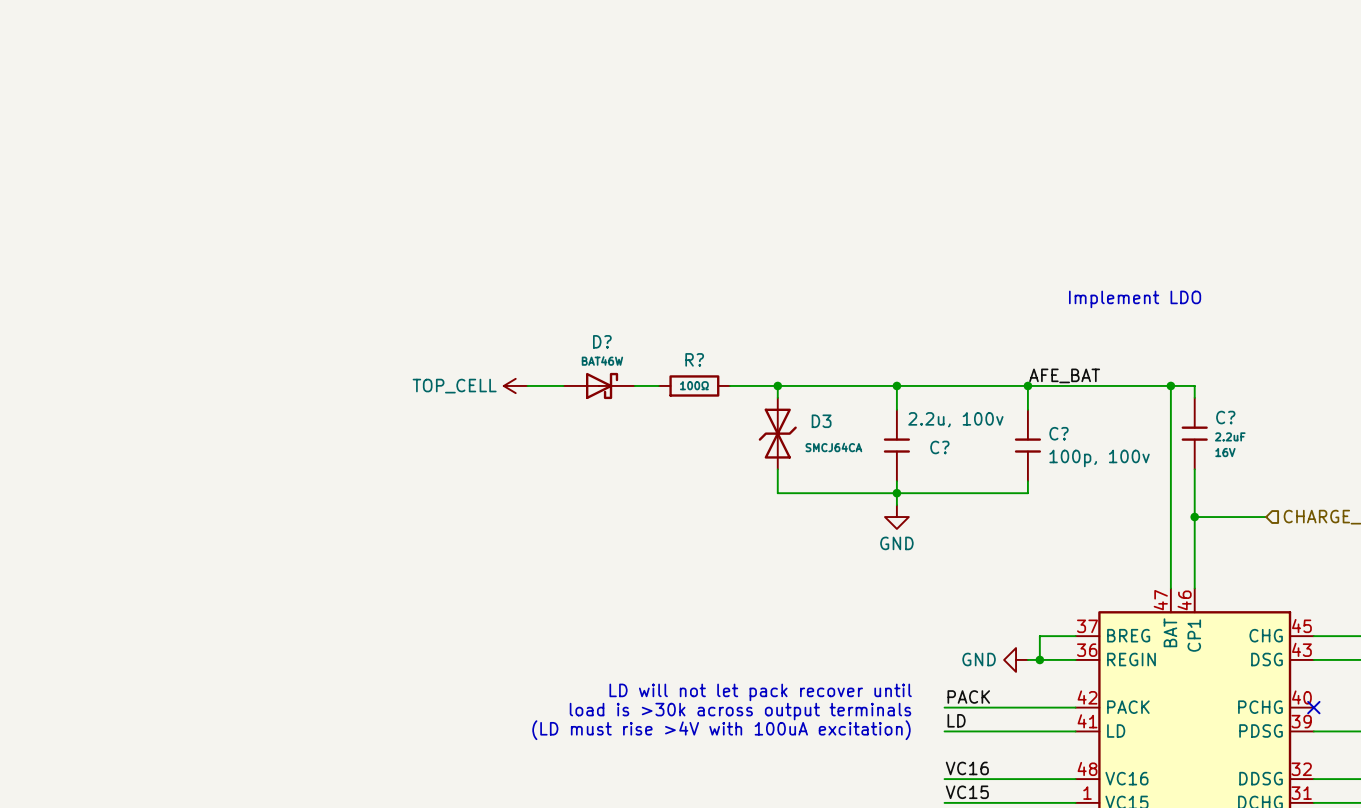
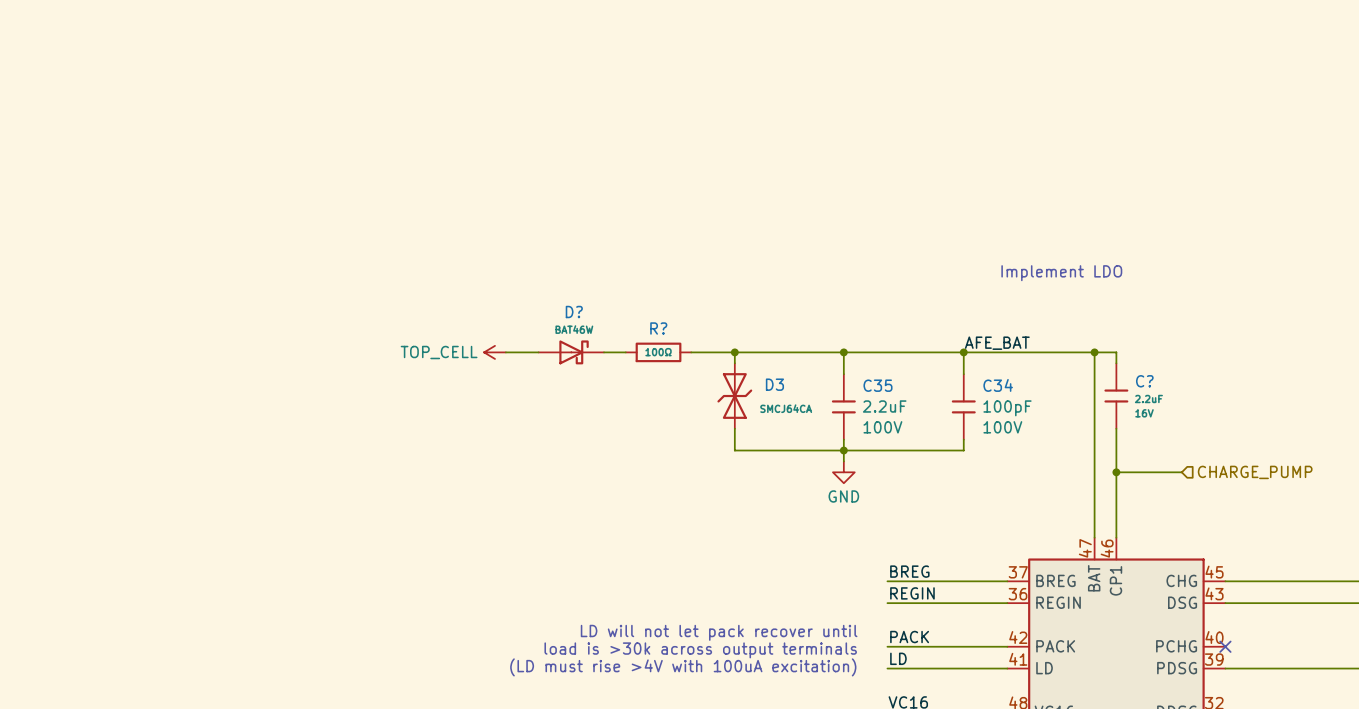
C? value: 2.2u, 100v (955, 419) -> 2.2uF (884, 406)
C? name: C? (1059, 433) -> C34 (998, 385)
C? name: C? (939, 447) -> C35 (877, 385)
C? value: 100p, 100v (1099, 458) -> 100pF (1007, 408)
C? text: none -> 100V (882, 427)
C? text: none -> 100V (1002, 427)
label: none -> BREG (909, 571)
wire: (1039, 636) (1039, 659) -> (974, 581) (887, 581)
label: none -> REGIN (912, 593)
wire: none -> (887, 603) (963, 603)
power symbol: GND (1016, 659) -> none
junction: (1039, 659) -> none

